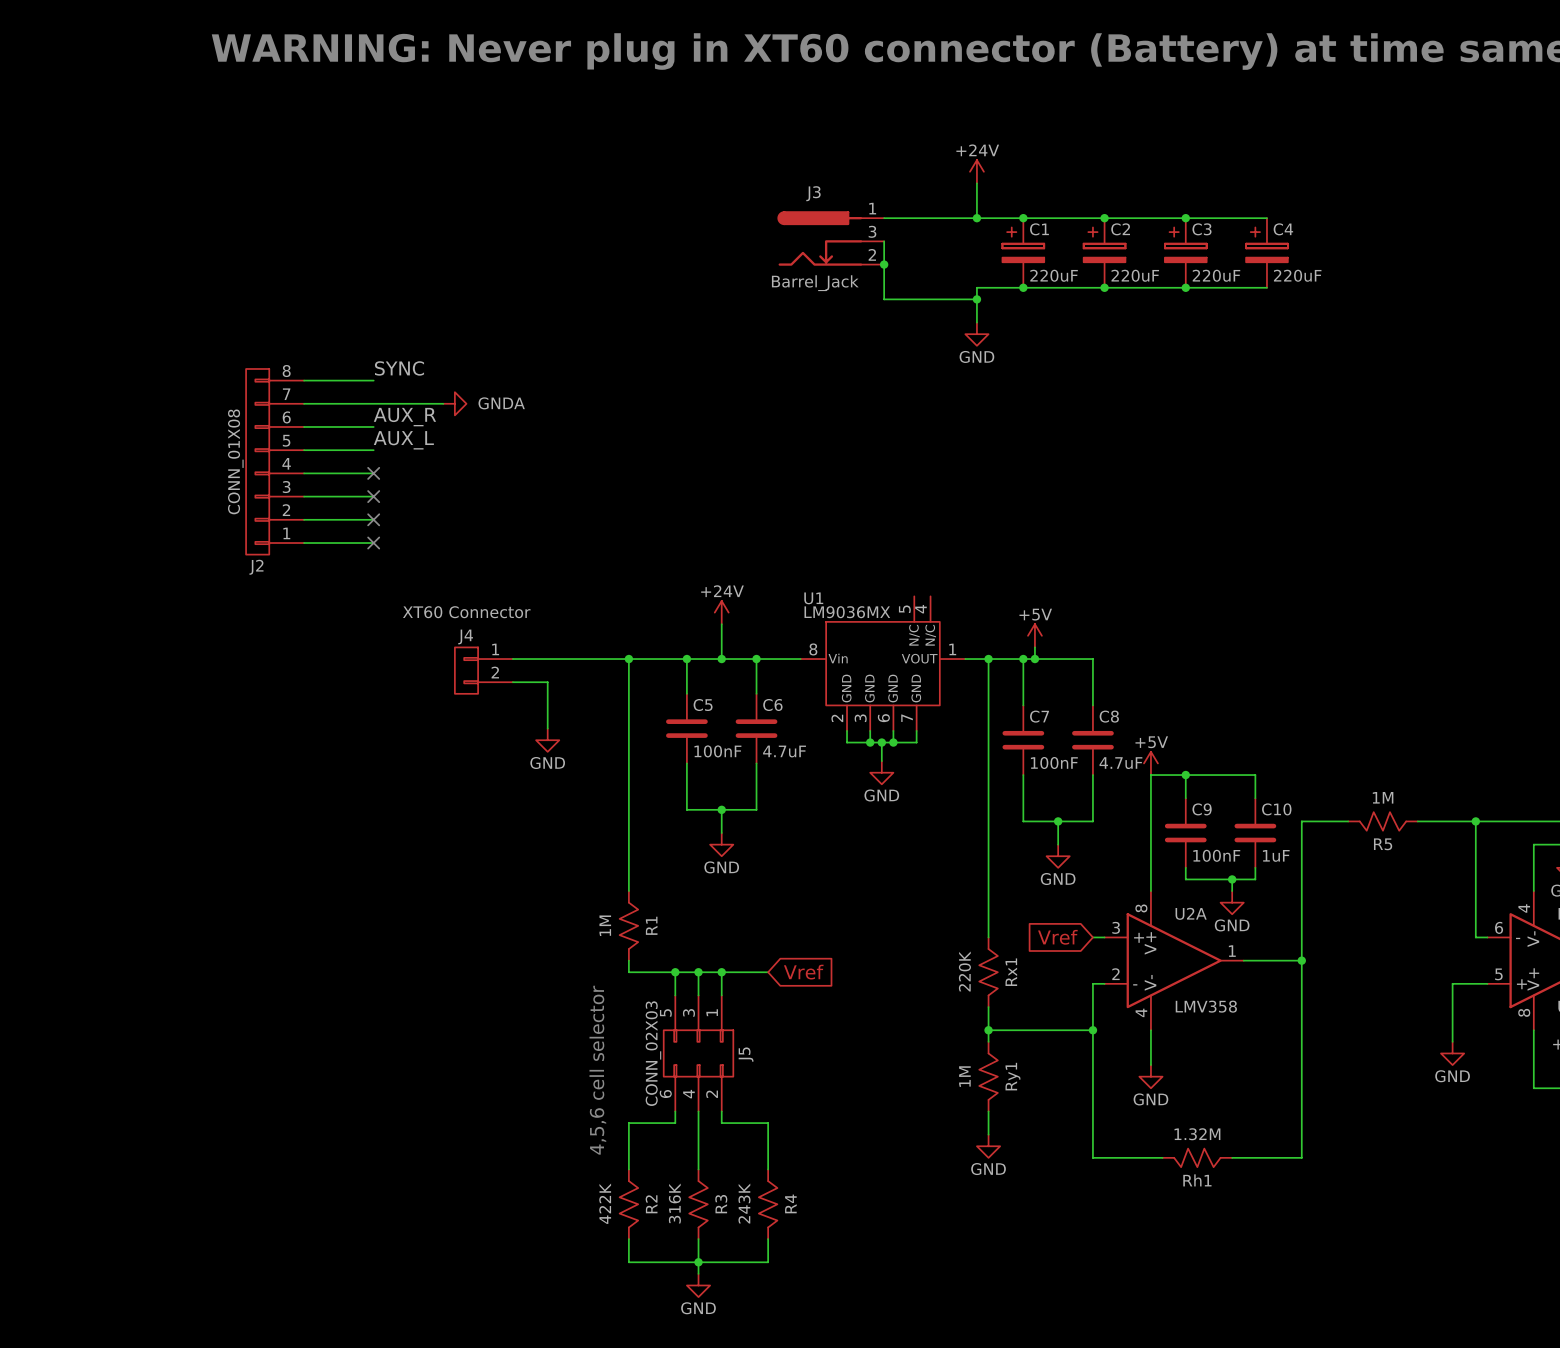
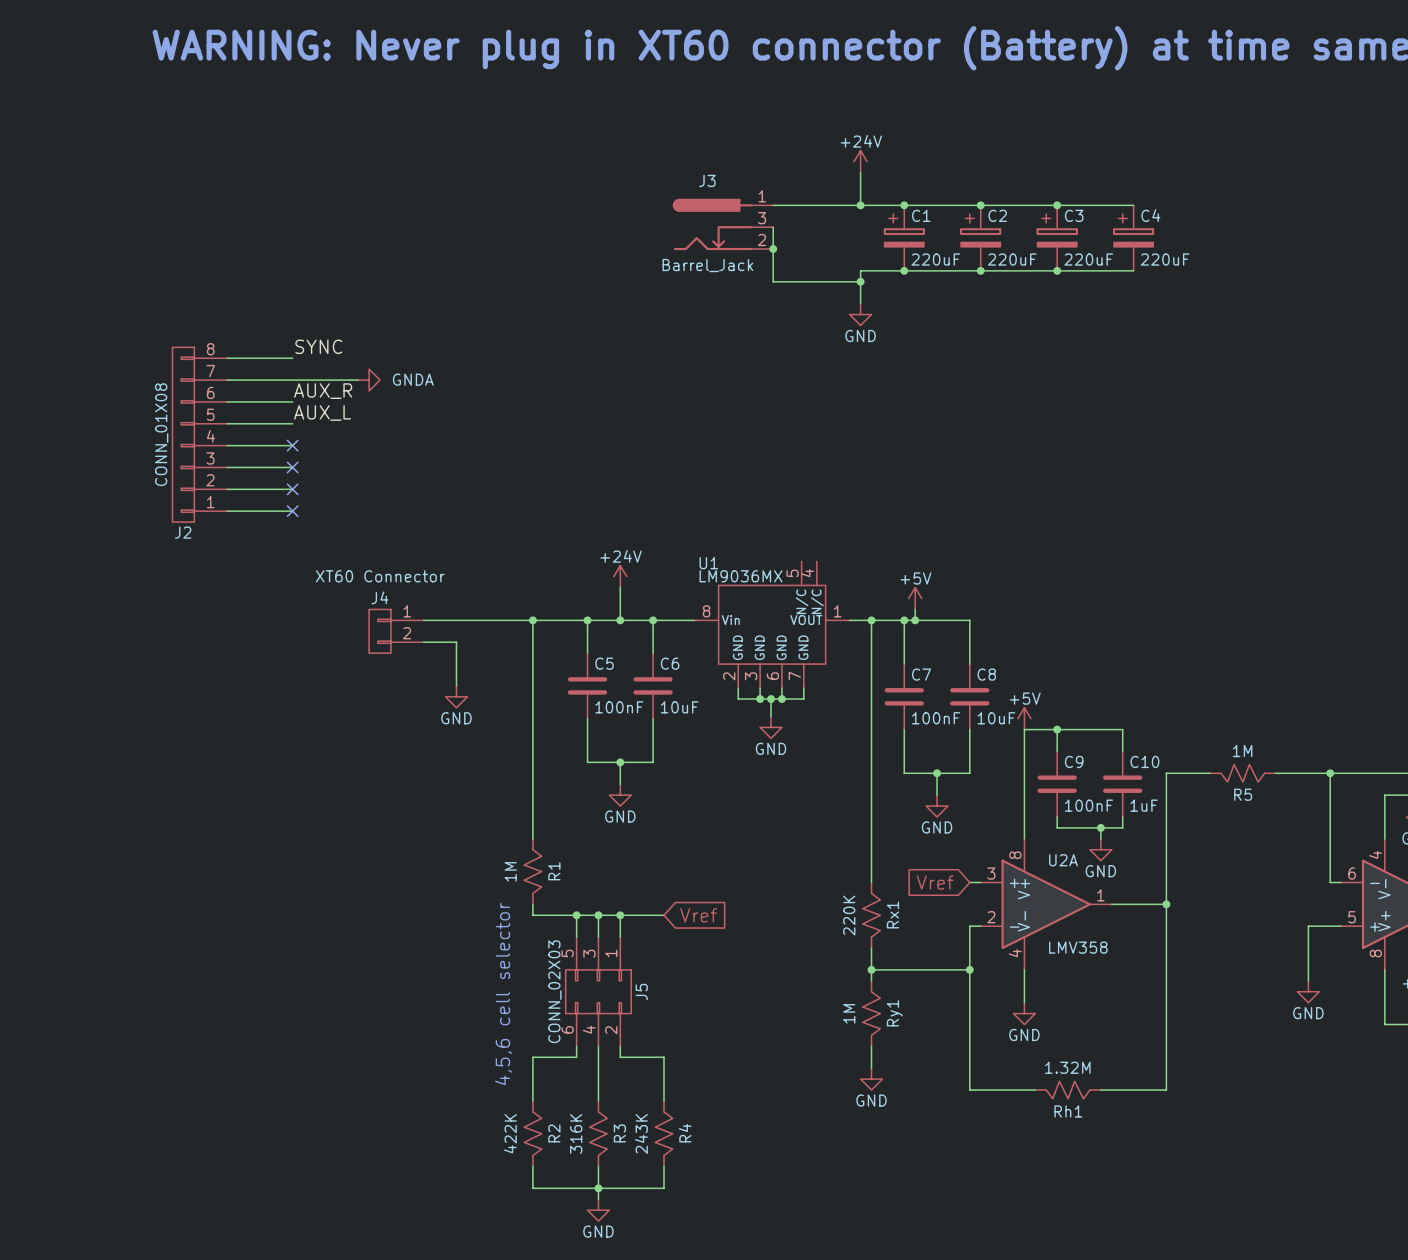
C6 value: 4.7uF (784, 751) -> 10uF (679, 707)
C8 value: 4.7uF (1120, 763) -> 10uF (996, 718)

